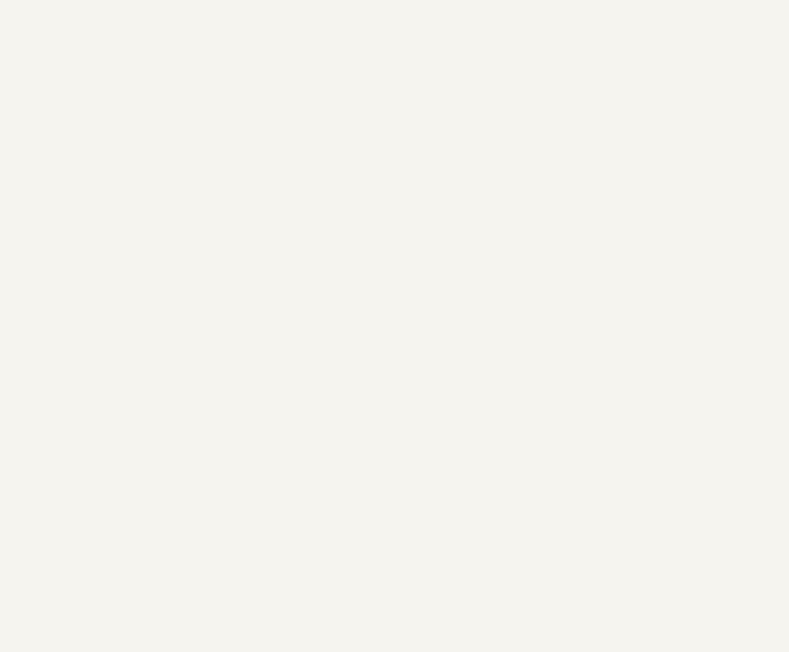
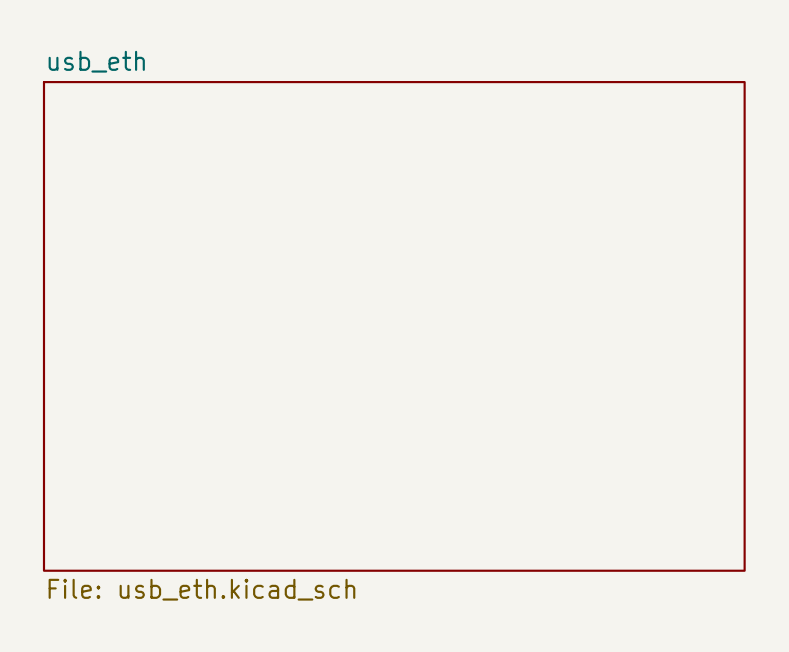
sheet usb_eth: none -> File: usb_eth.kicad_sch (394, 326)

